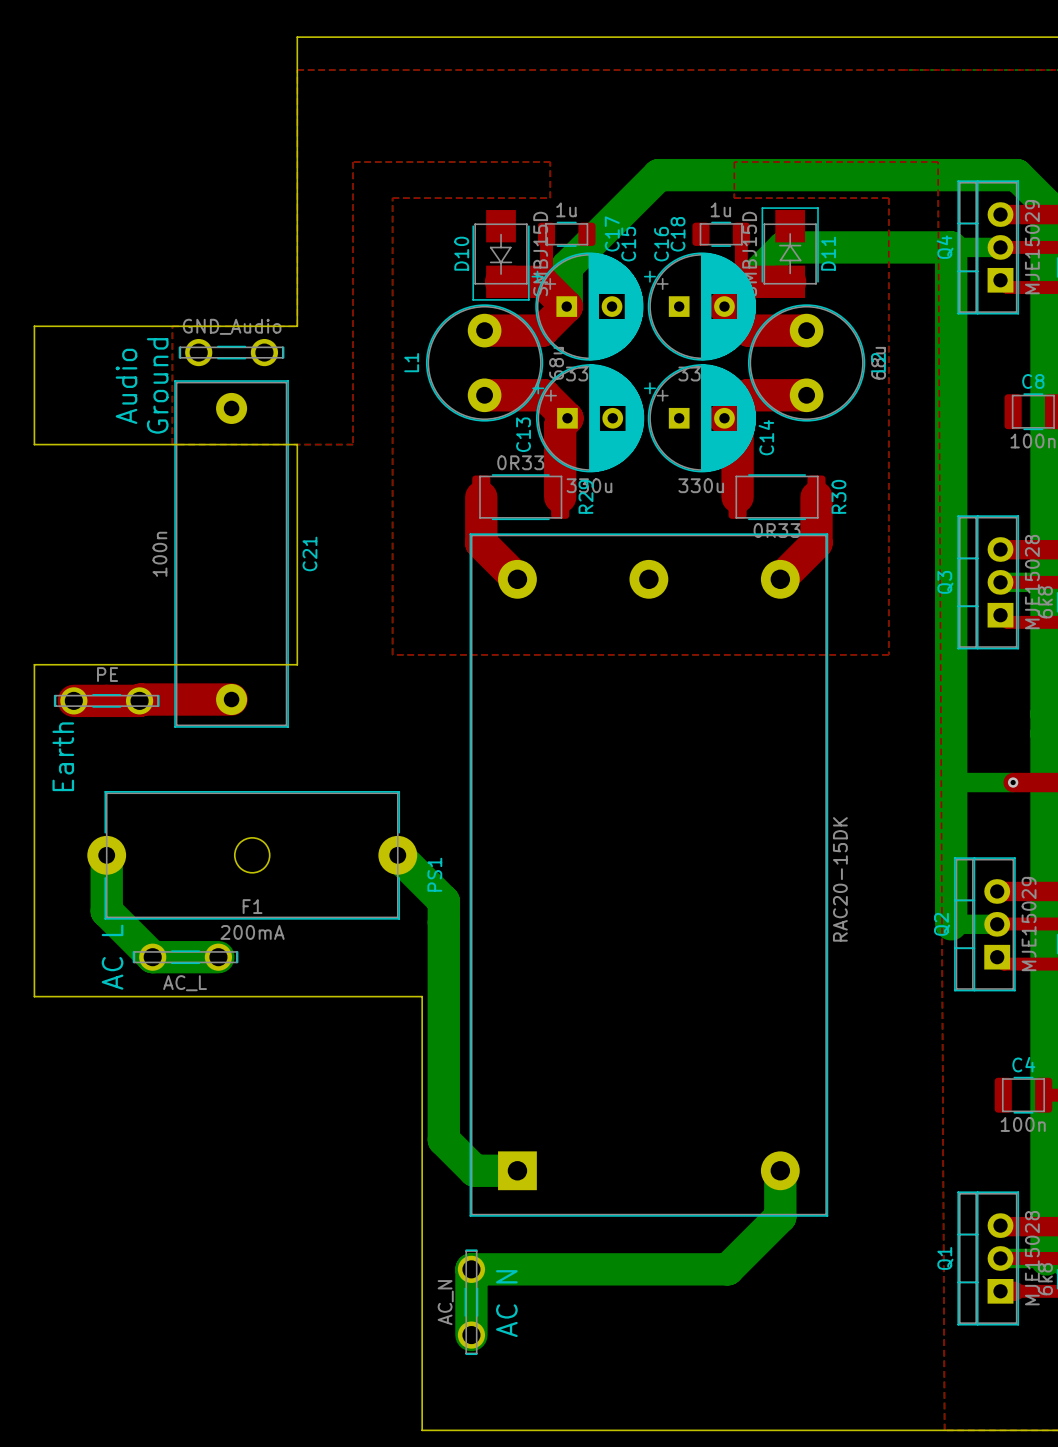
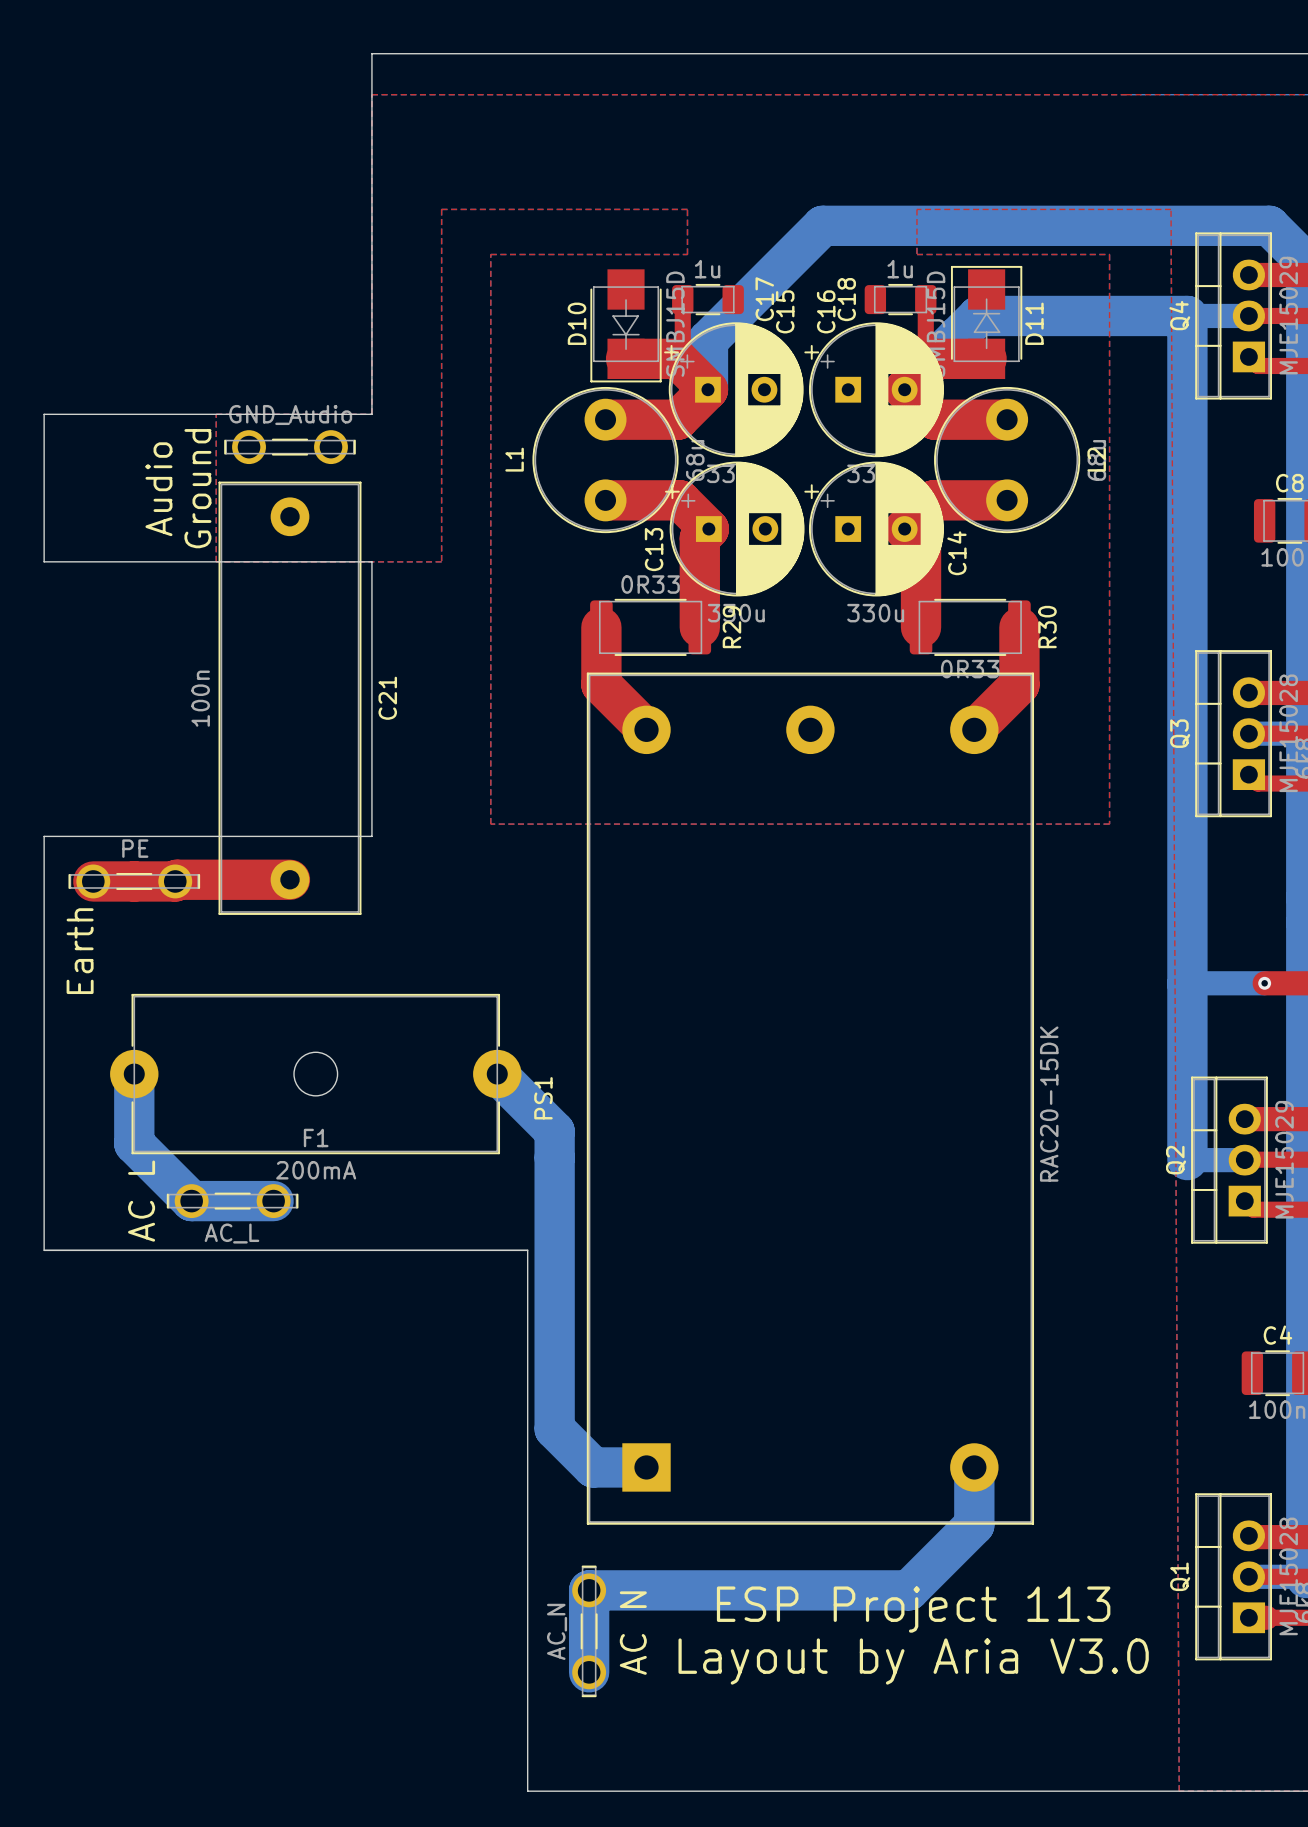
text: none -> ESP Project 113 (913, 1609)
text: none -> Layout by Aria V3.0 (913, 1661)

